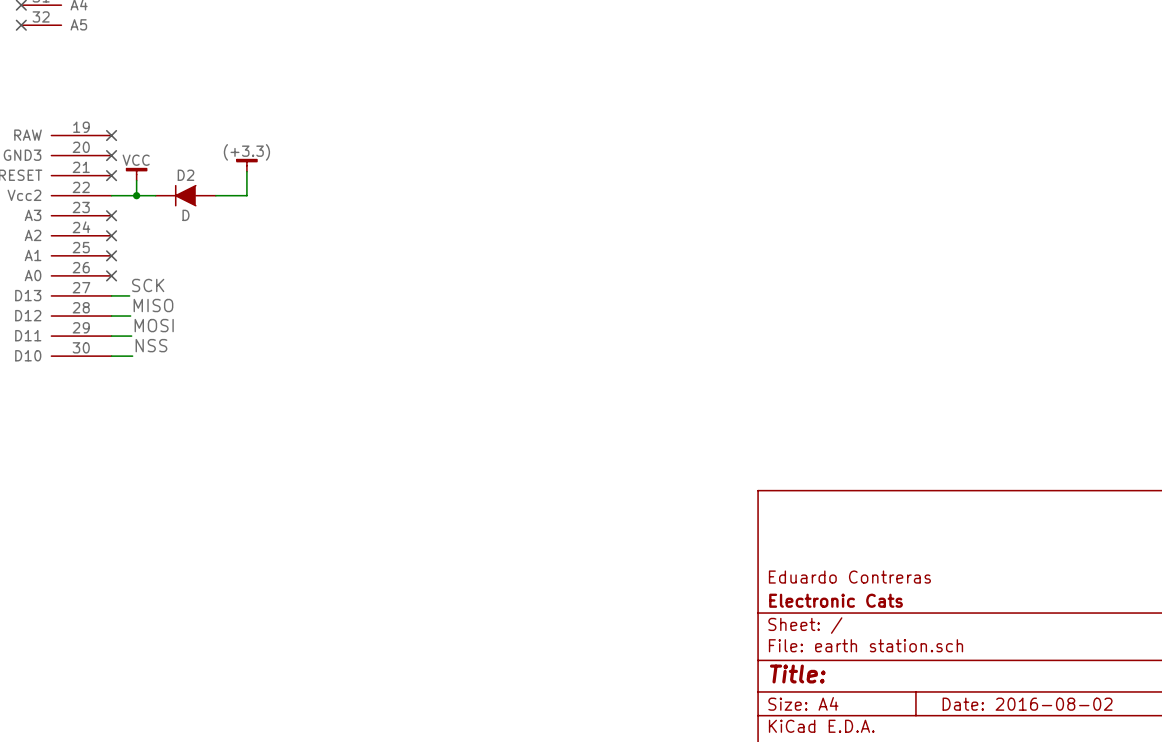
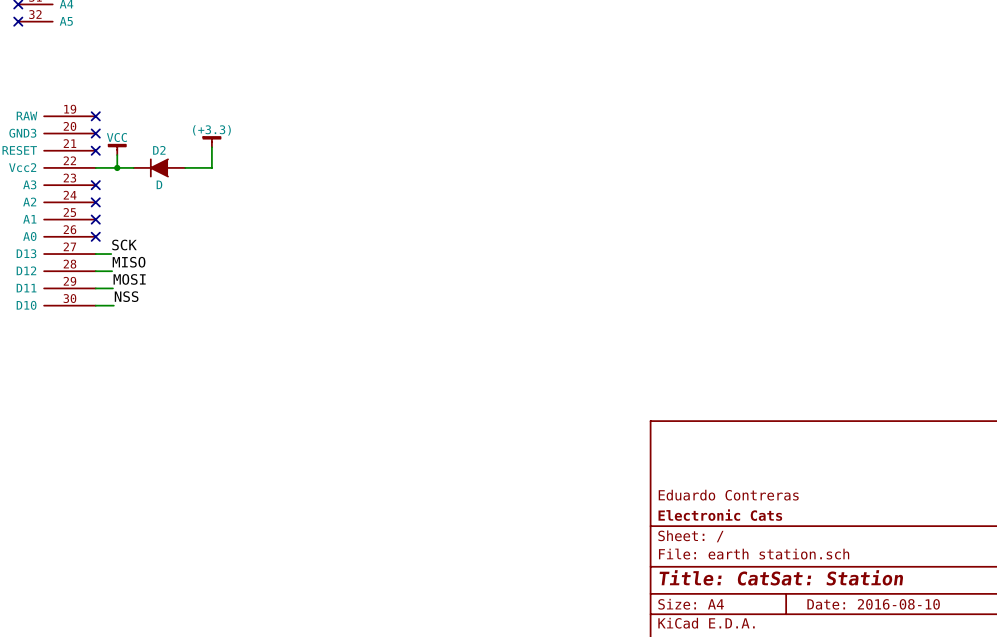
title block: Title: (797, 674) -> Title: CatSat: Station (781, 577)
title block: Date: 2016-08-02 (1027, 704) -> Date: 2016-08-10 (873, 604)

